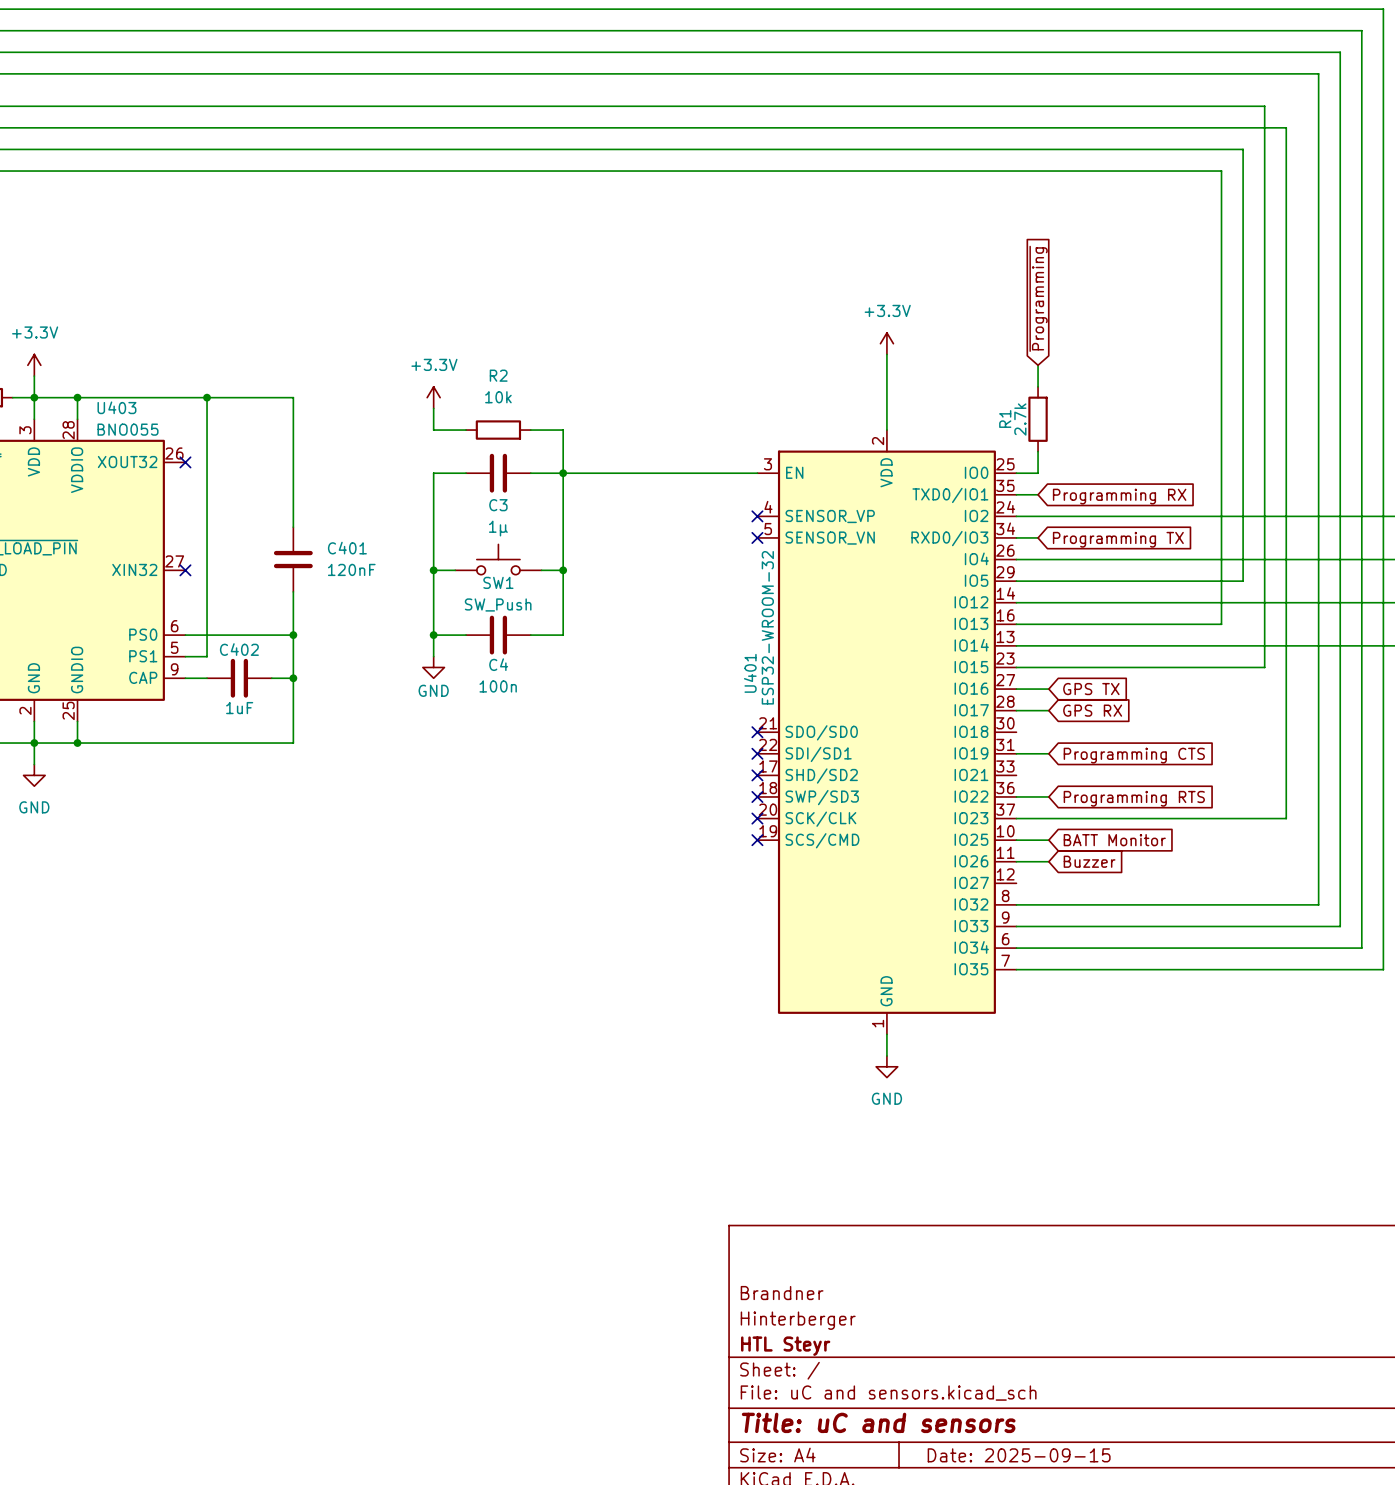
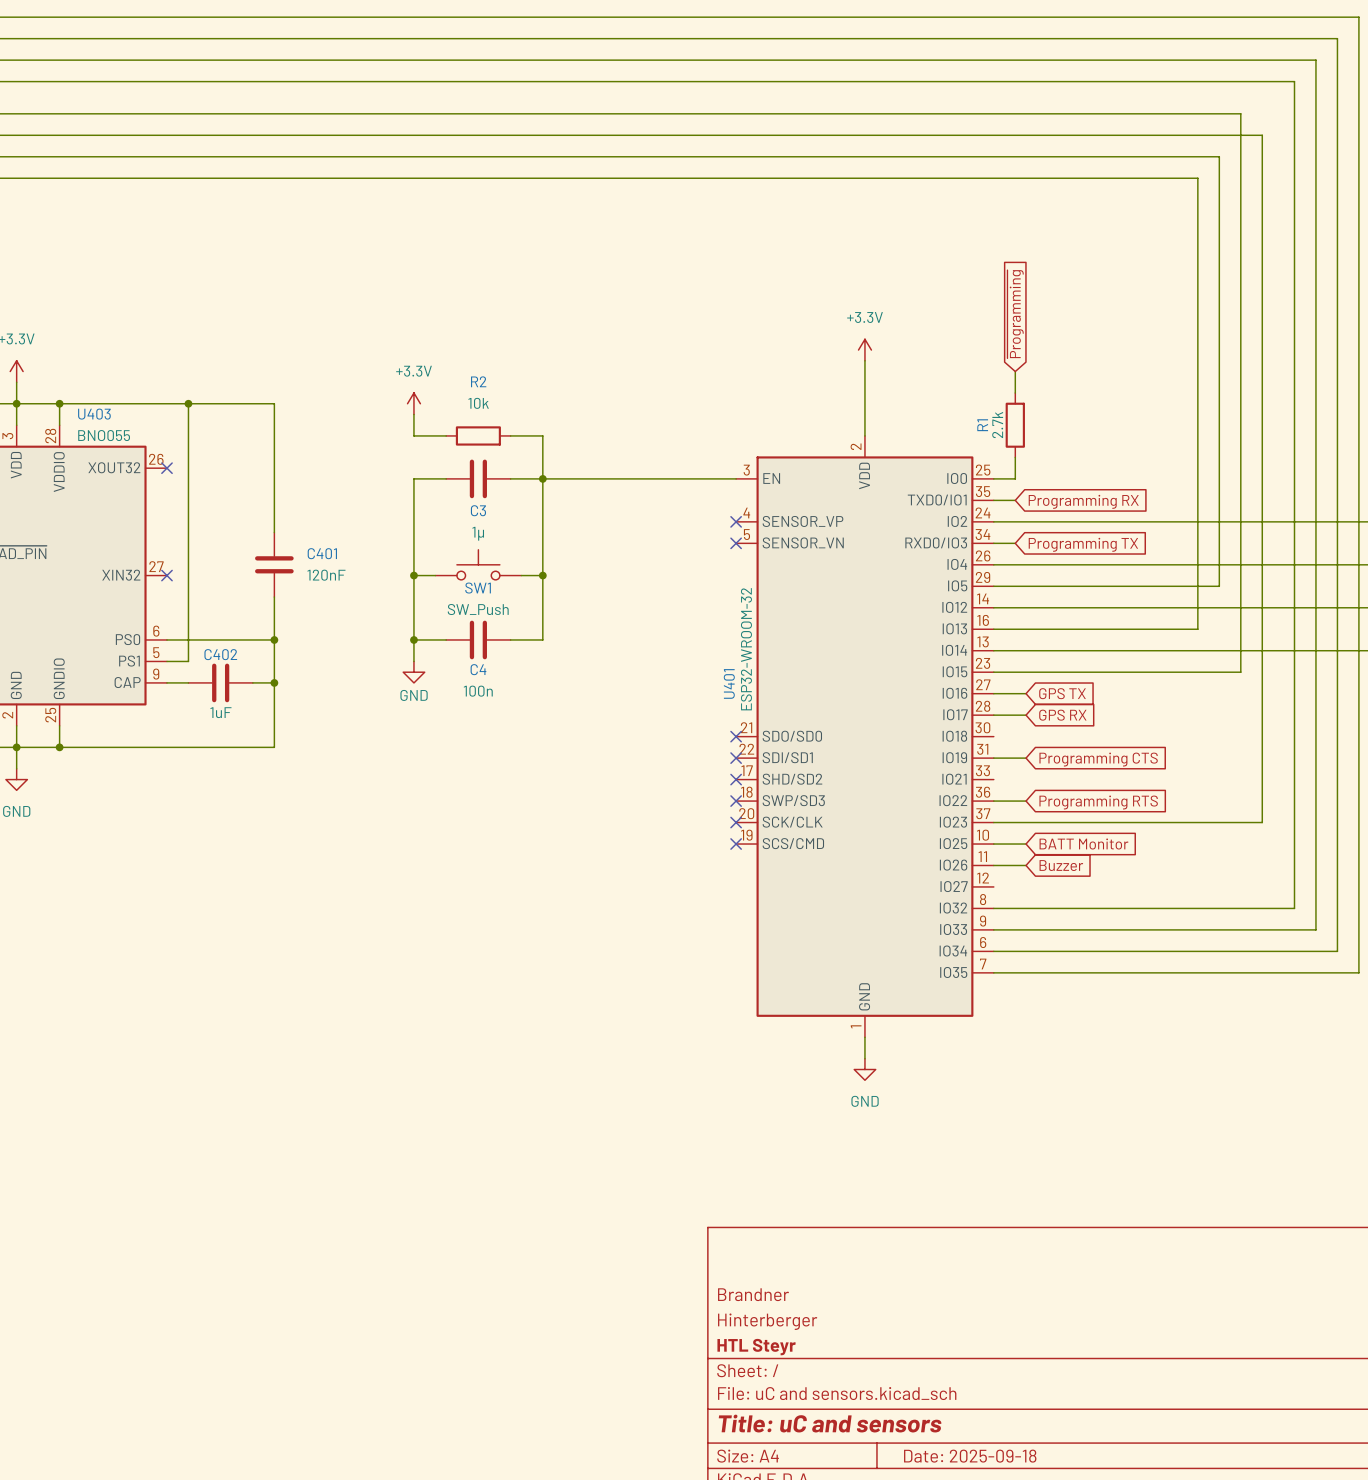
title block: Date: 2025-09-15 (1019, 1455) -> Date: 2025-09-18 (970, 1456)

